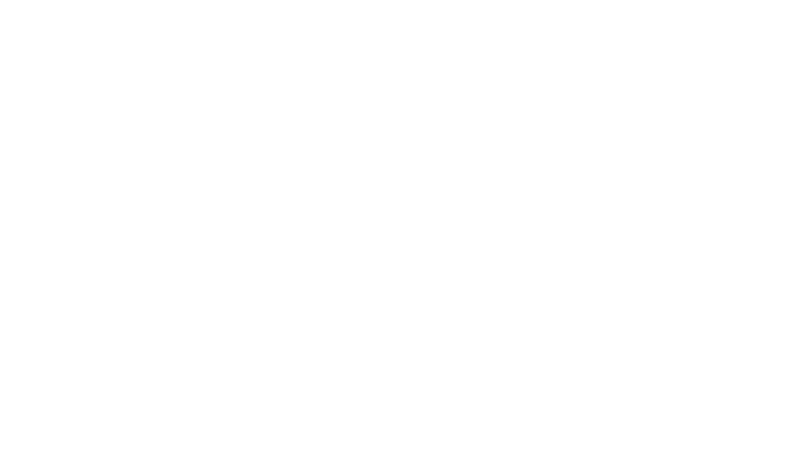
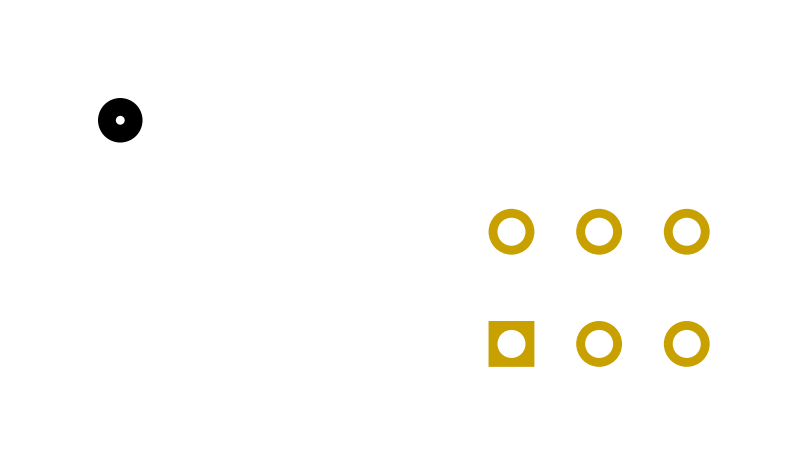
part: none -> (120, 120)
part: none -> (599, 287)

